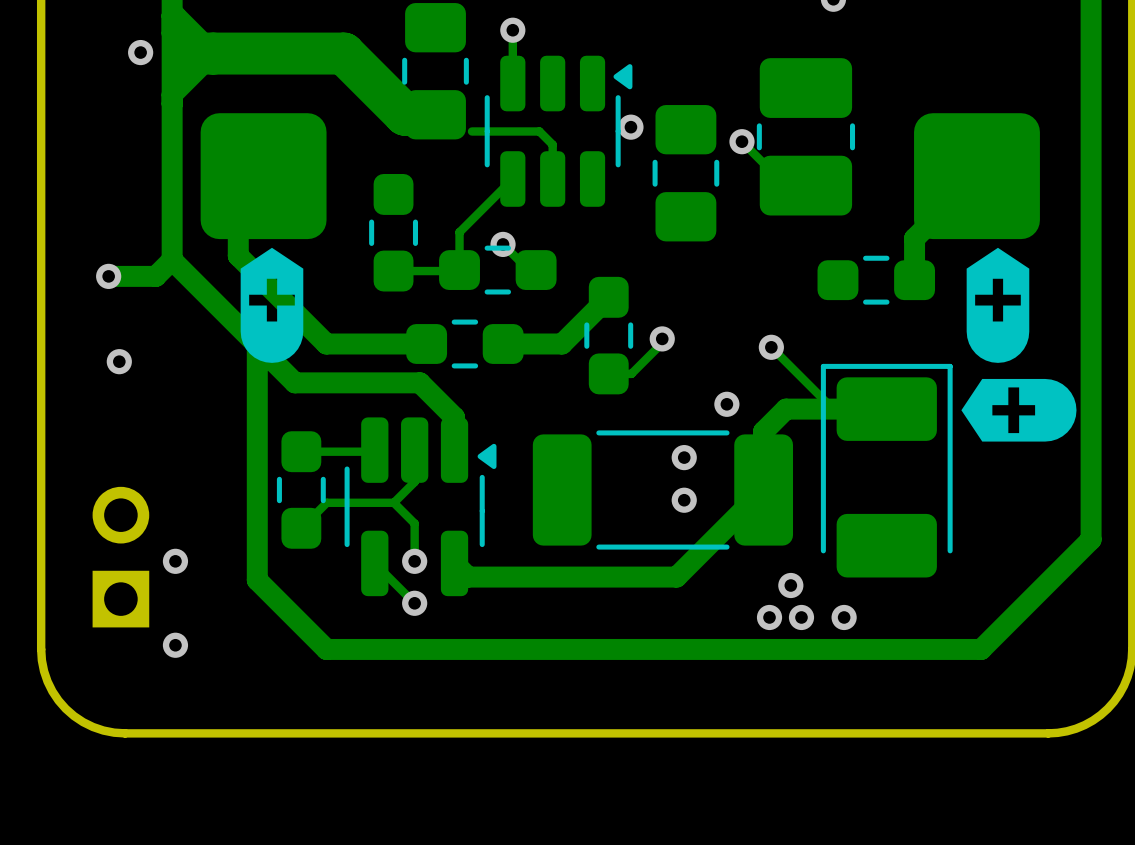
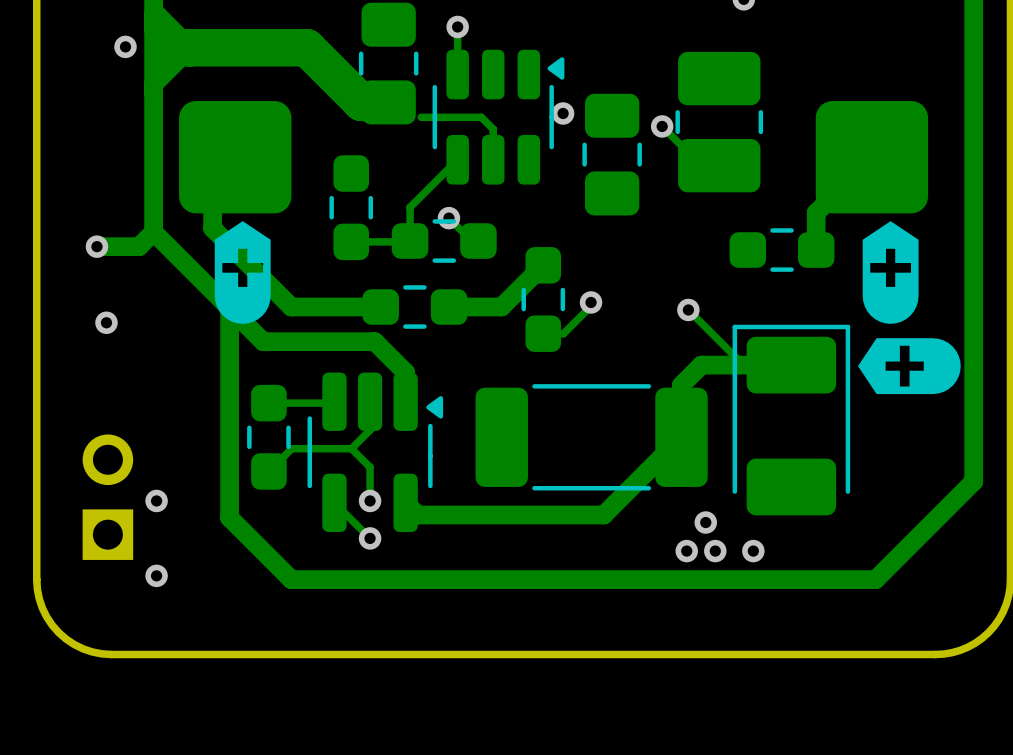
via: (726, 404) -> none
via: (684, 457) -> none
via: (684, 500) -> none

